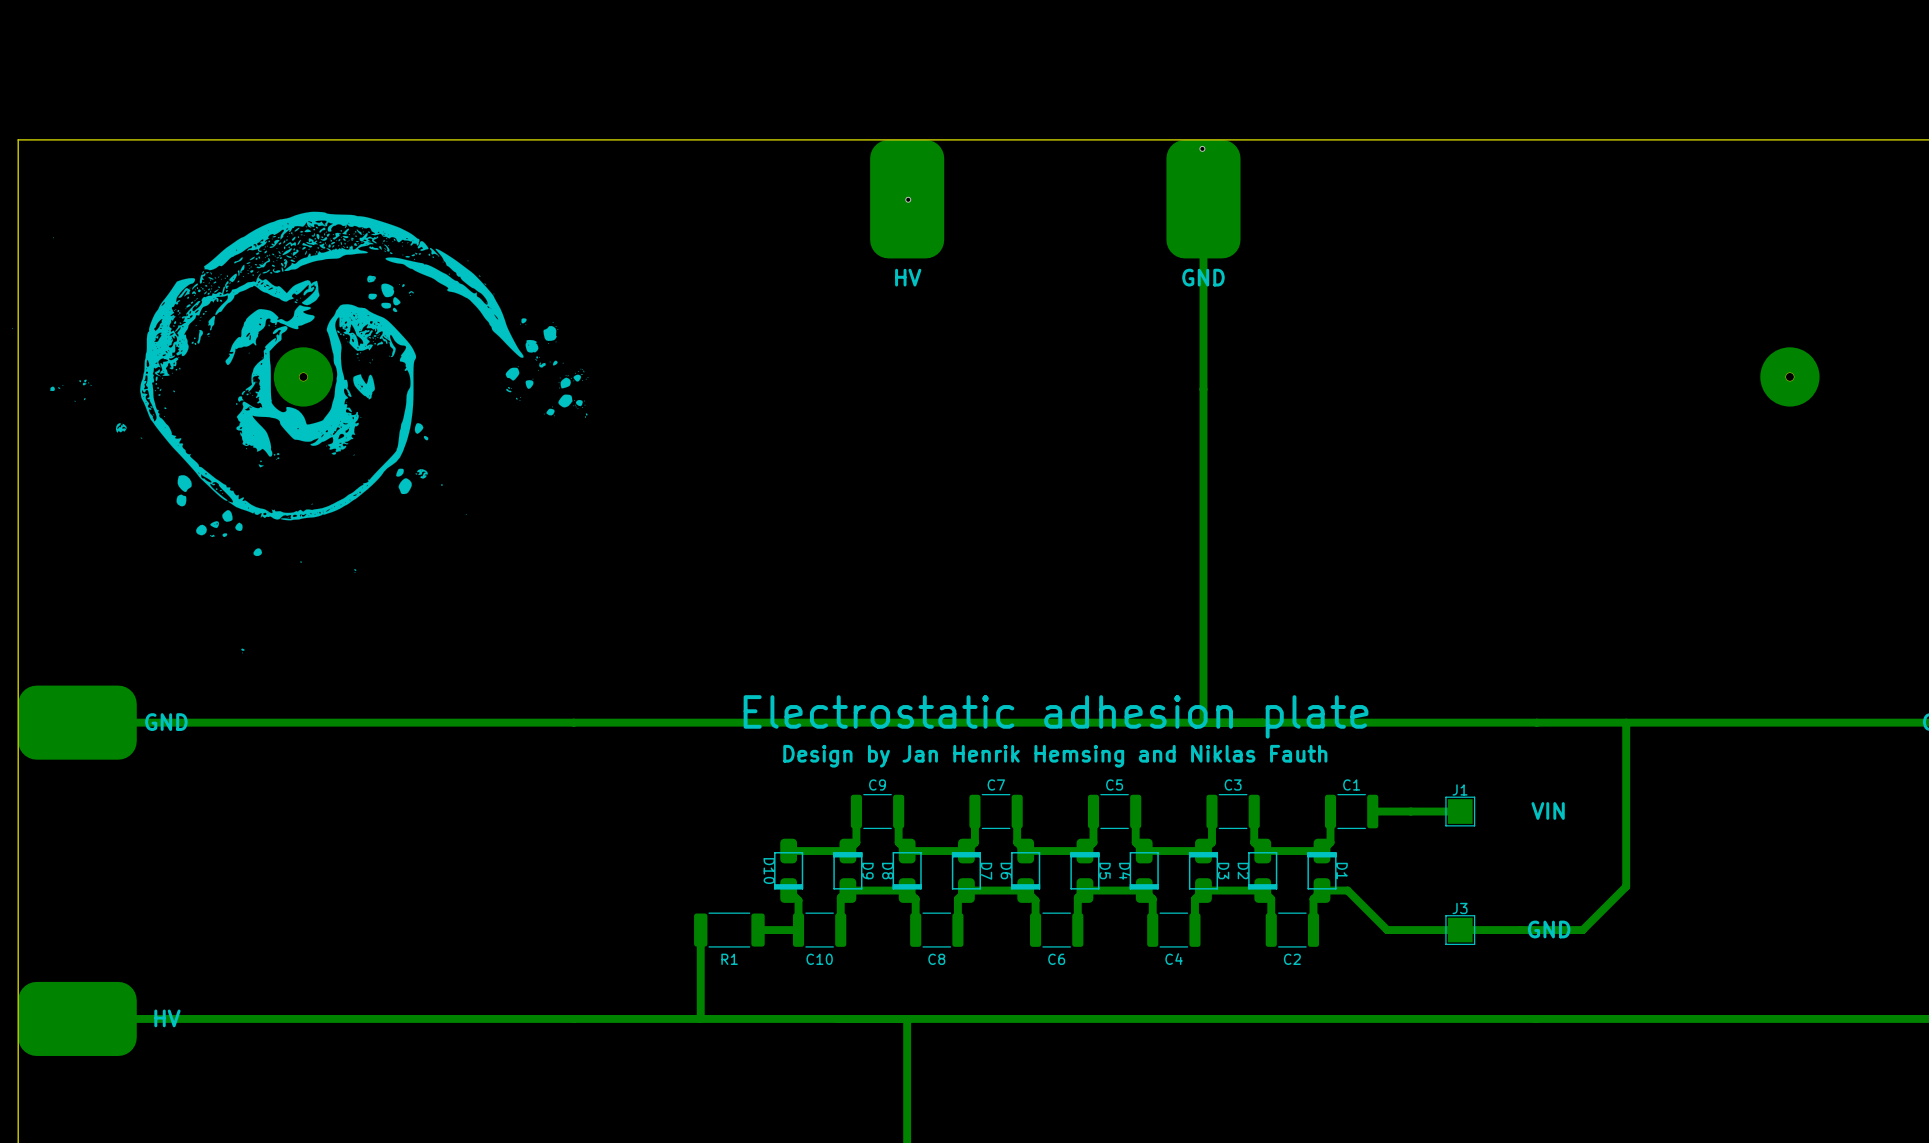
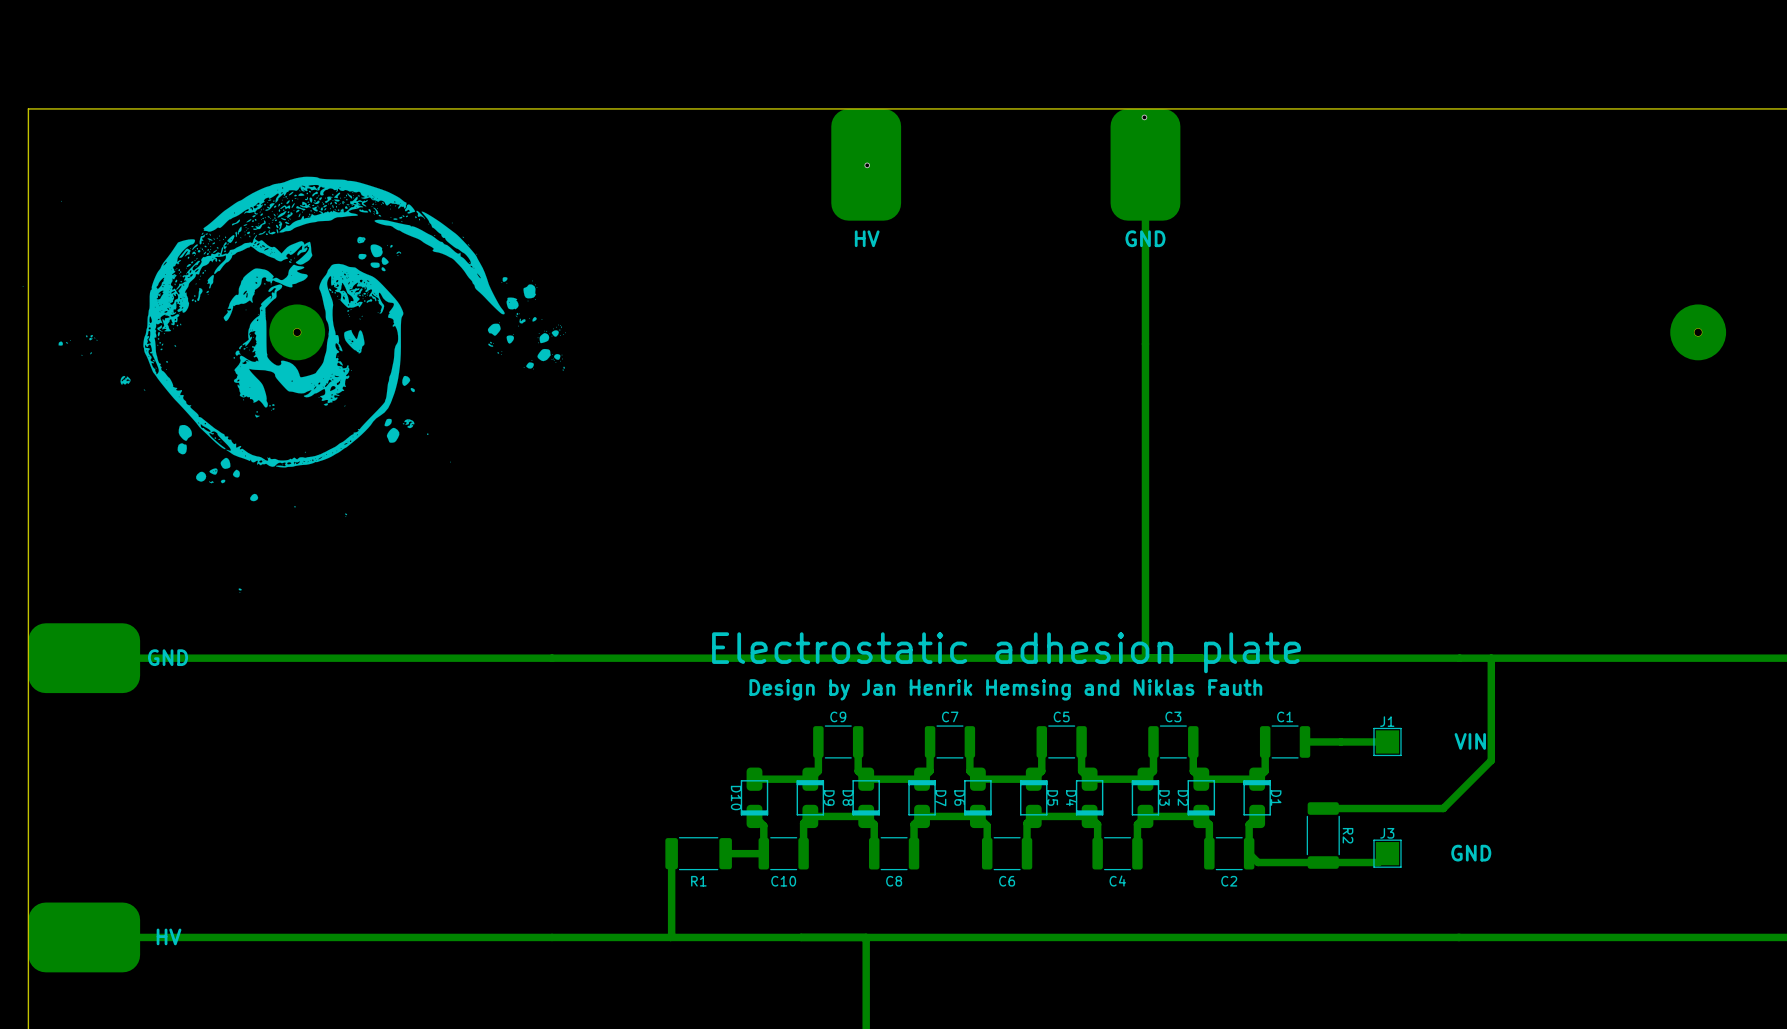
track: none -> (1491, 658) (1491, 760) (1443, 808) (1323, 808)
track: (1626, 722) (1626, 886) (1582, 930) (1387, 930) (1347, 890) (1322, 890) -> none
R2: none -> (1323, 835)
track: none -> (1387, 853) (1378, 862) (1257, 862) (1249, 853)

